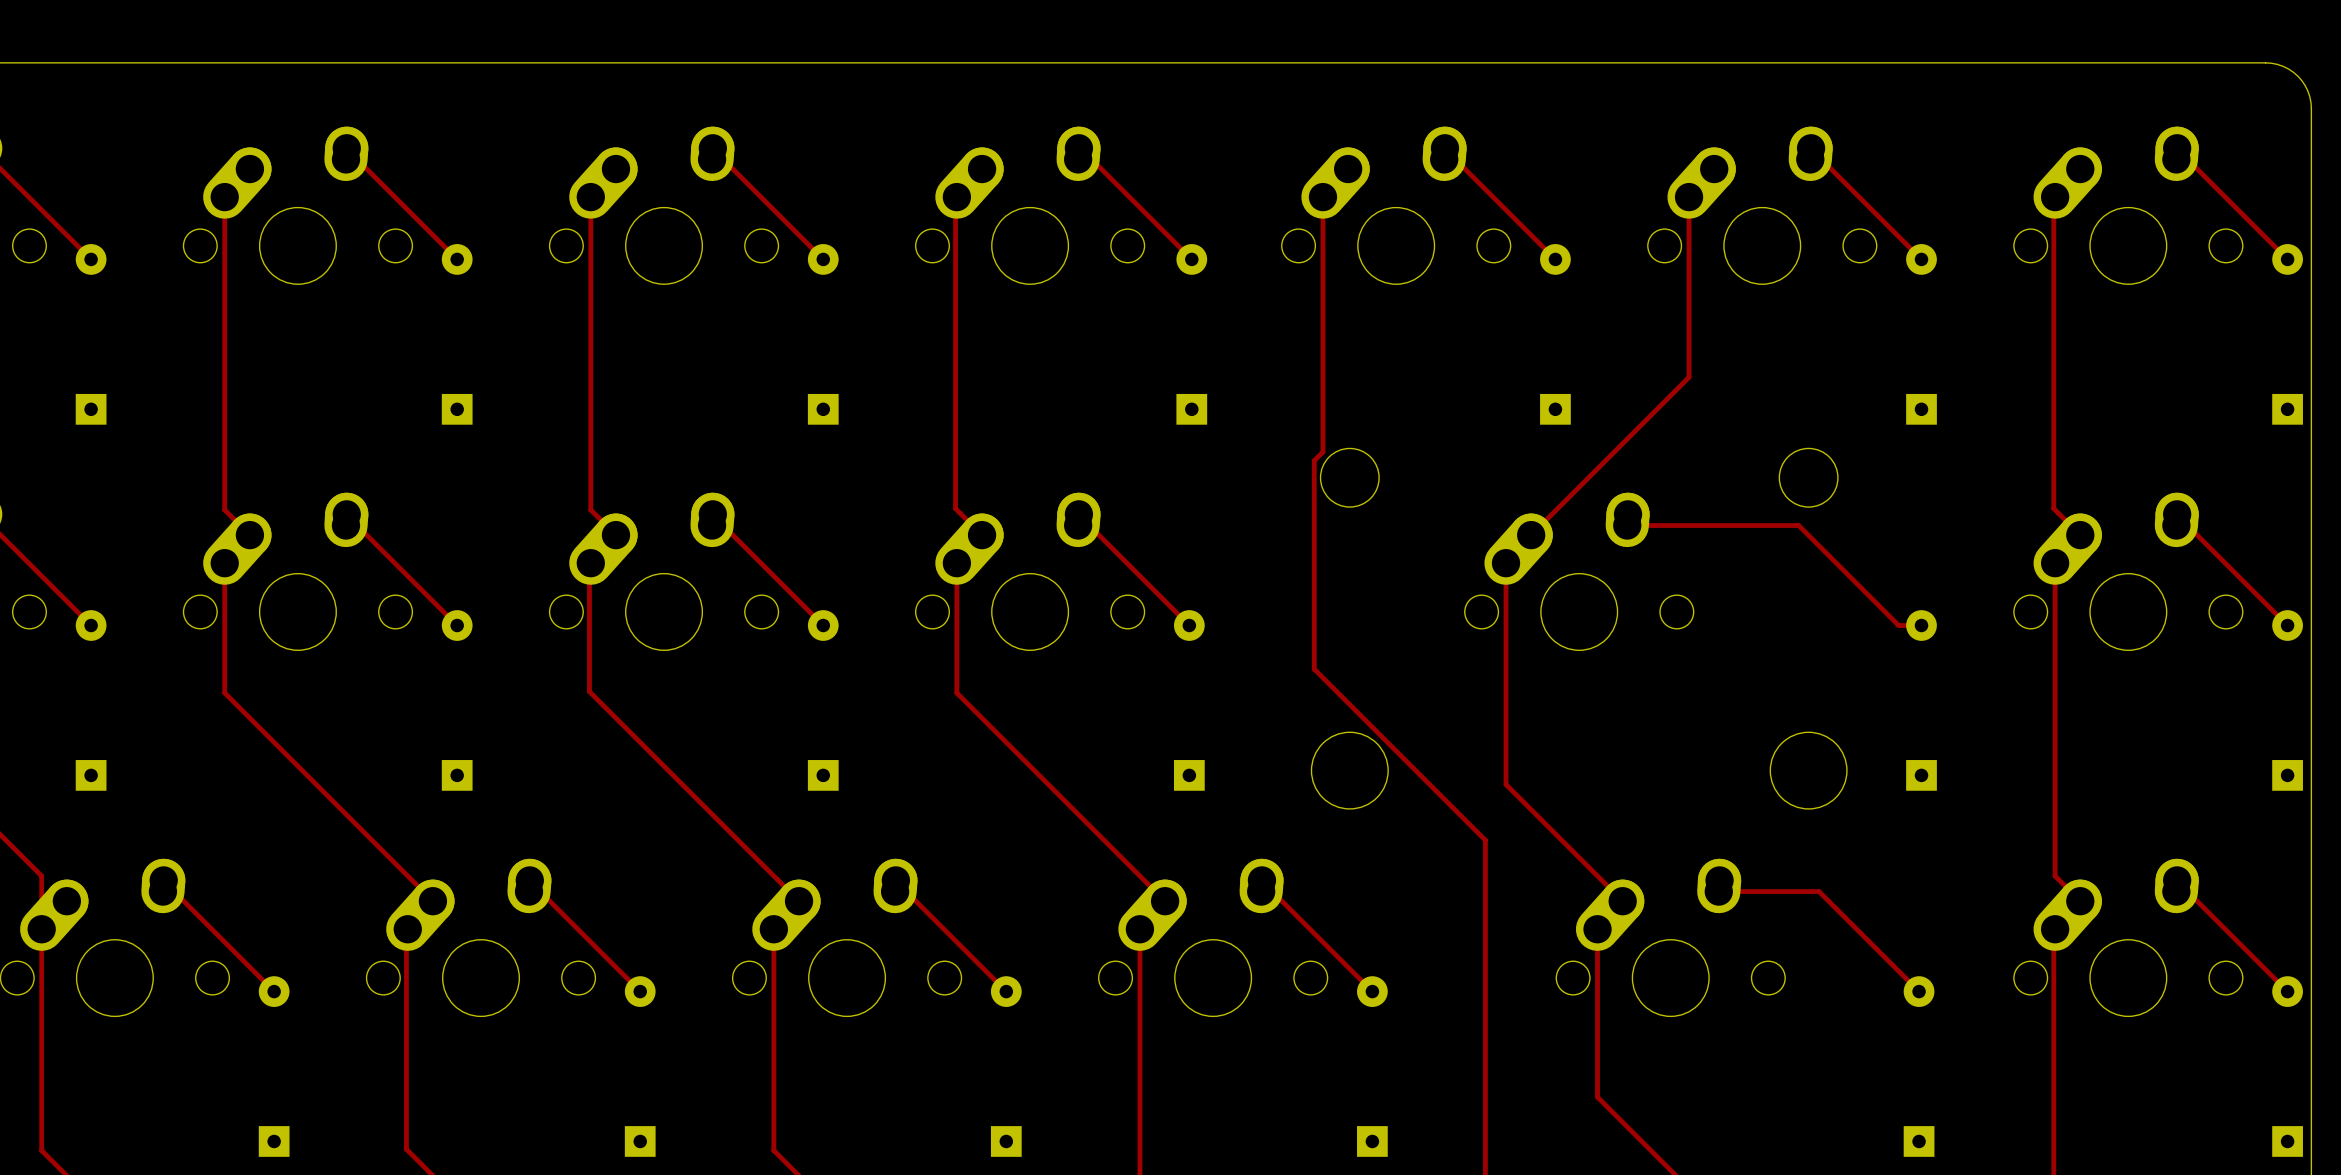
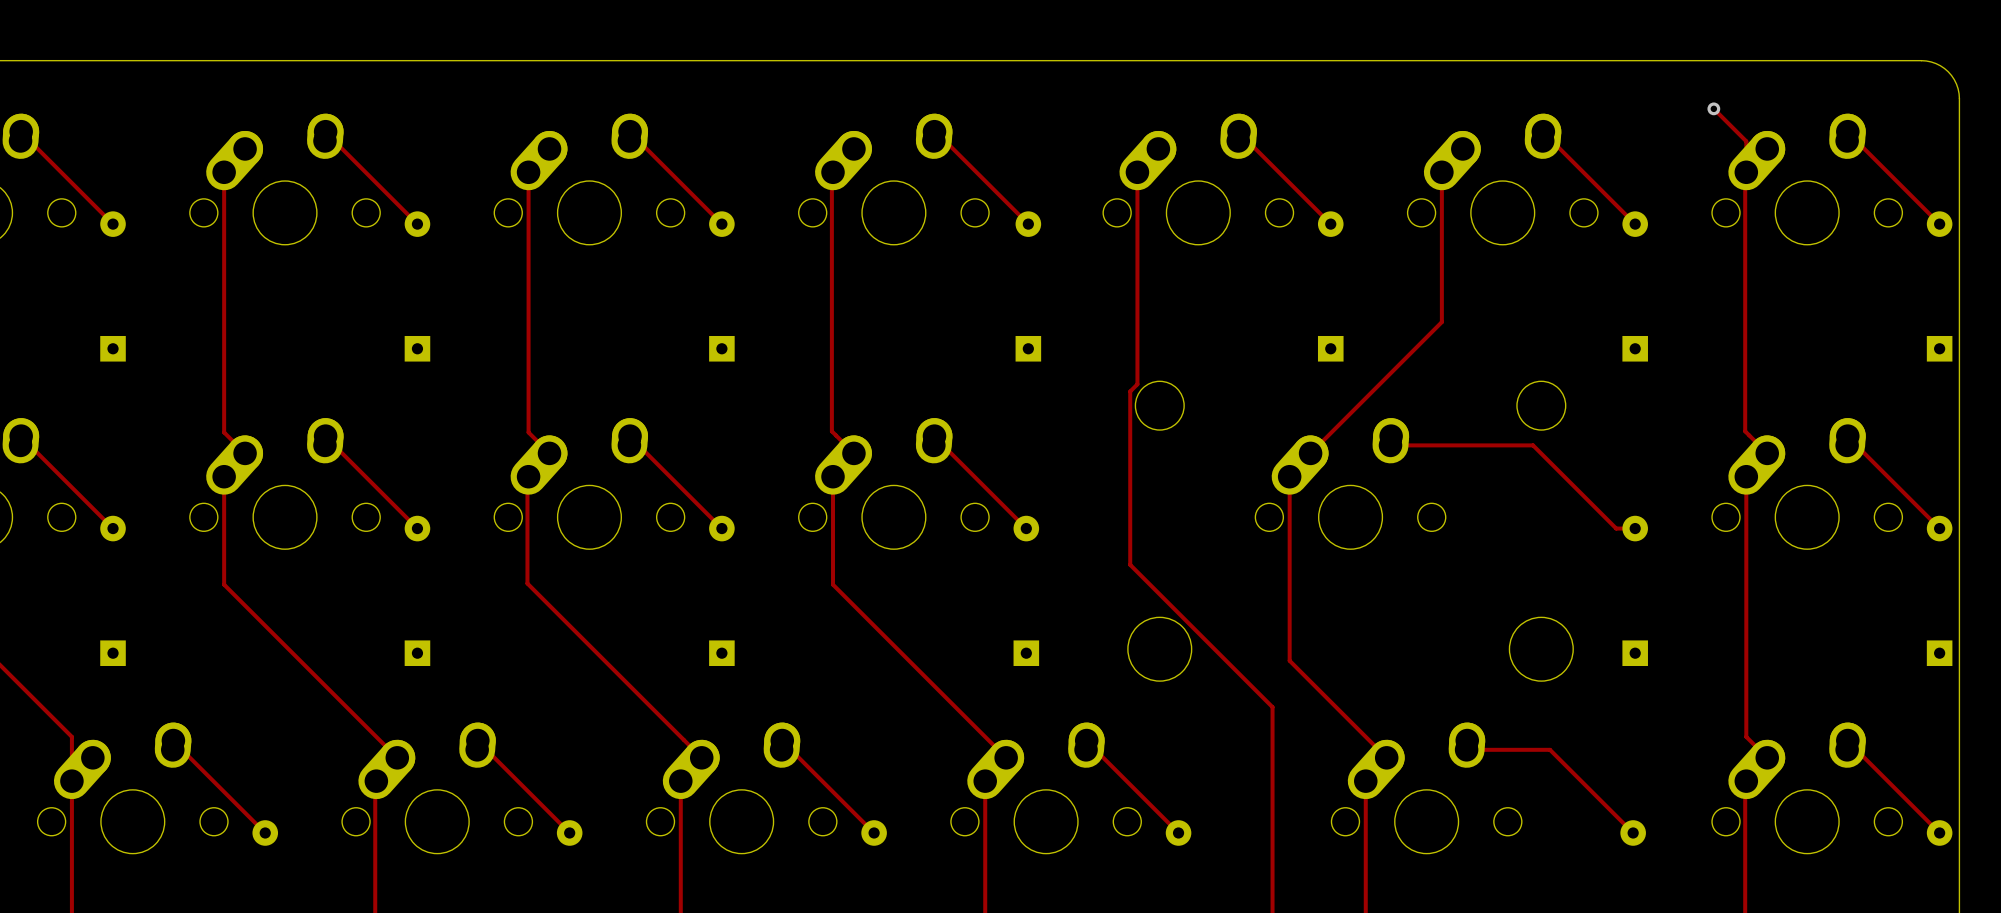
track: none -> (1713, 108) (1746, 141) (1746, 172)
via: none -> (1713, 108)

